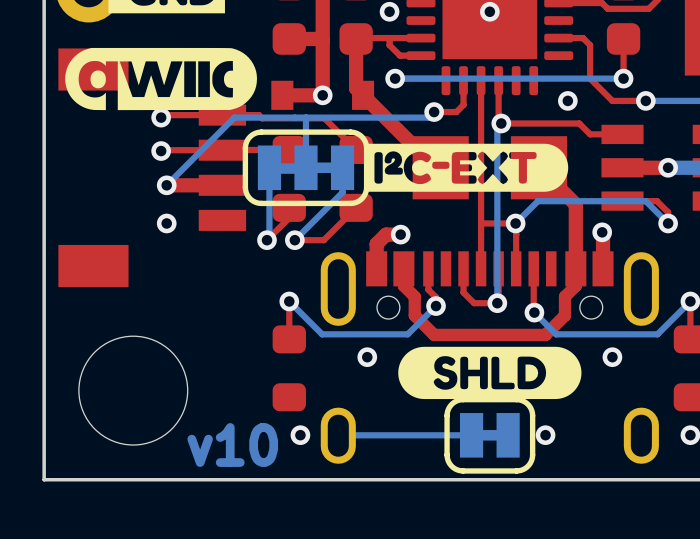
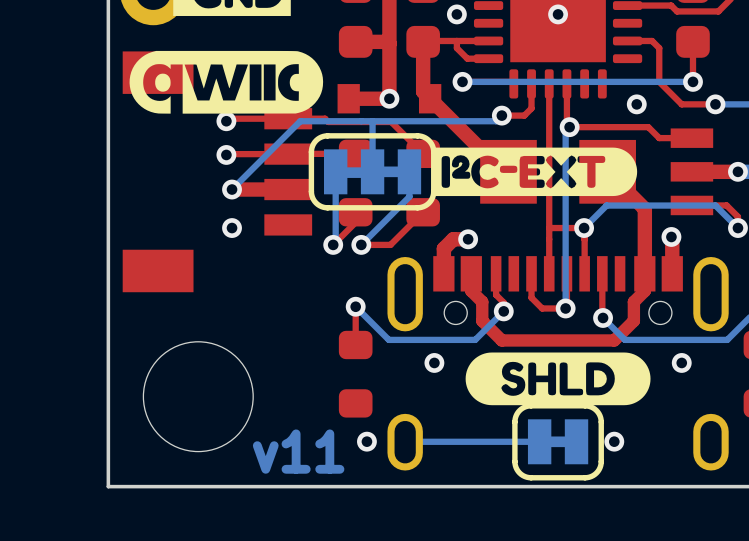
text: v10 (232, 445) -> v11 (298, 451)

